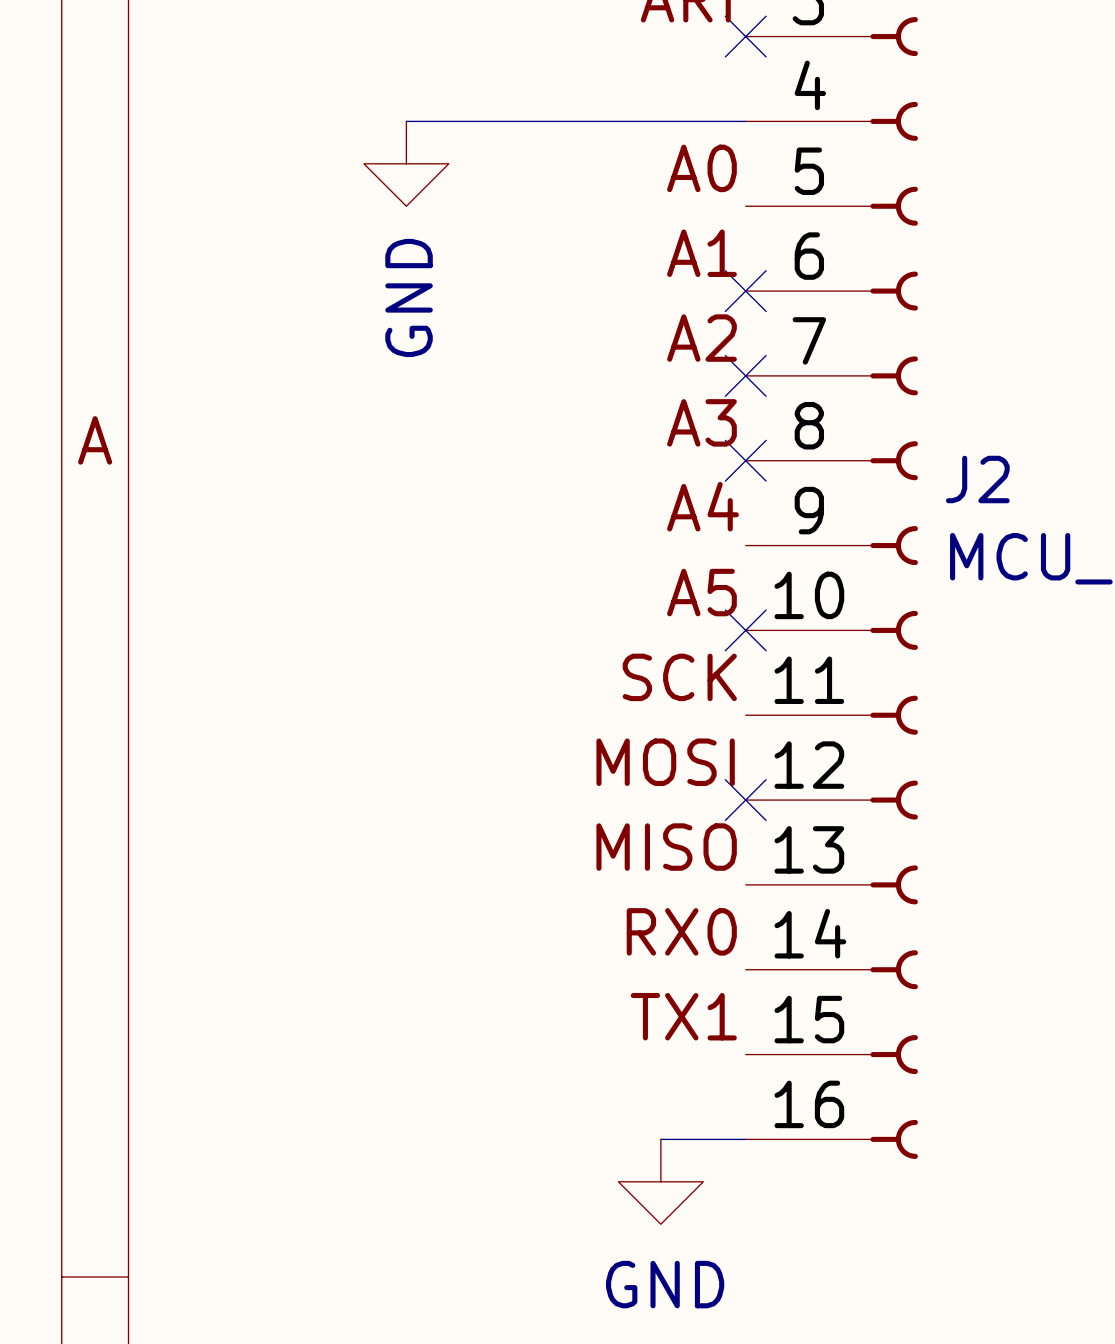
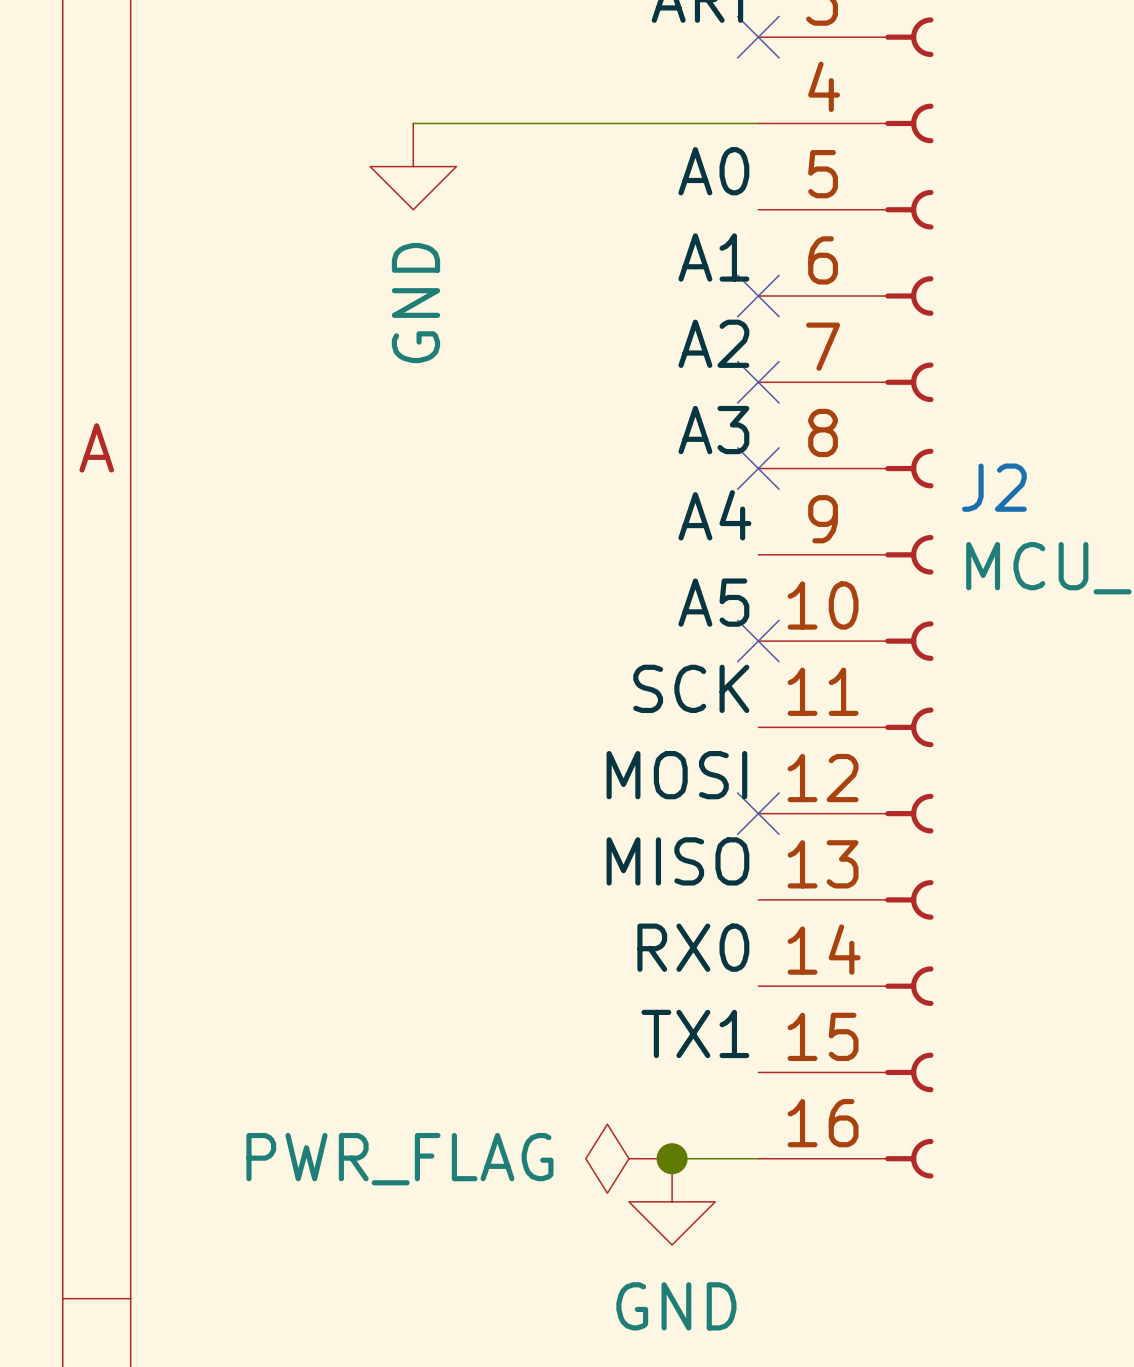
power symbol: none -> PWR_FLAG (628, 1158)
junction: none -> (672, 1158)

